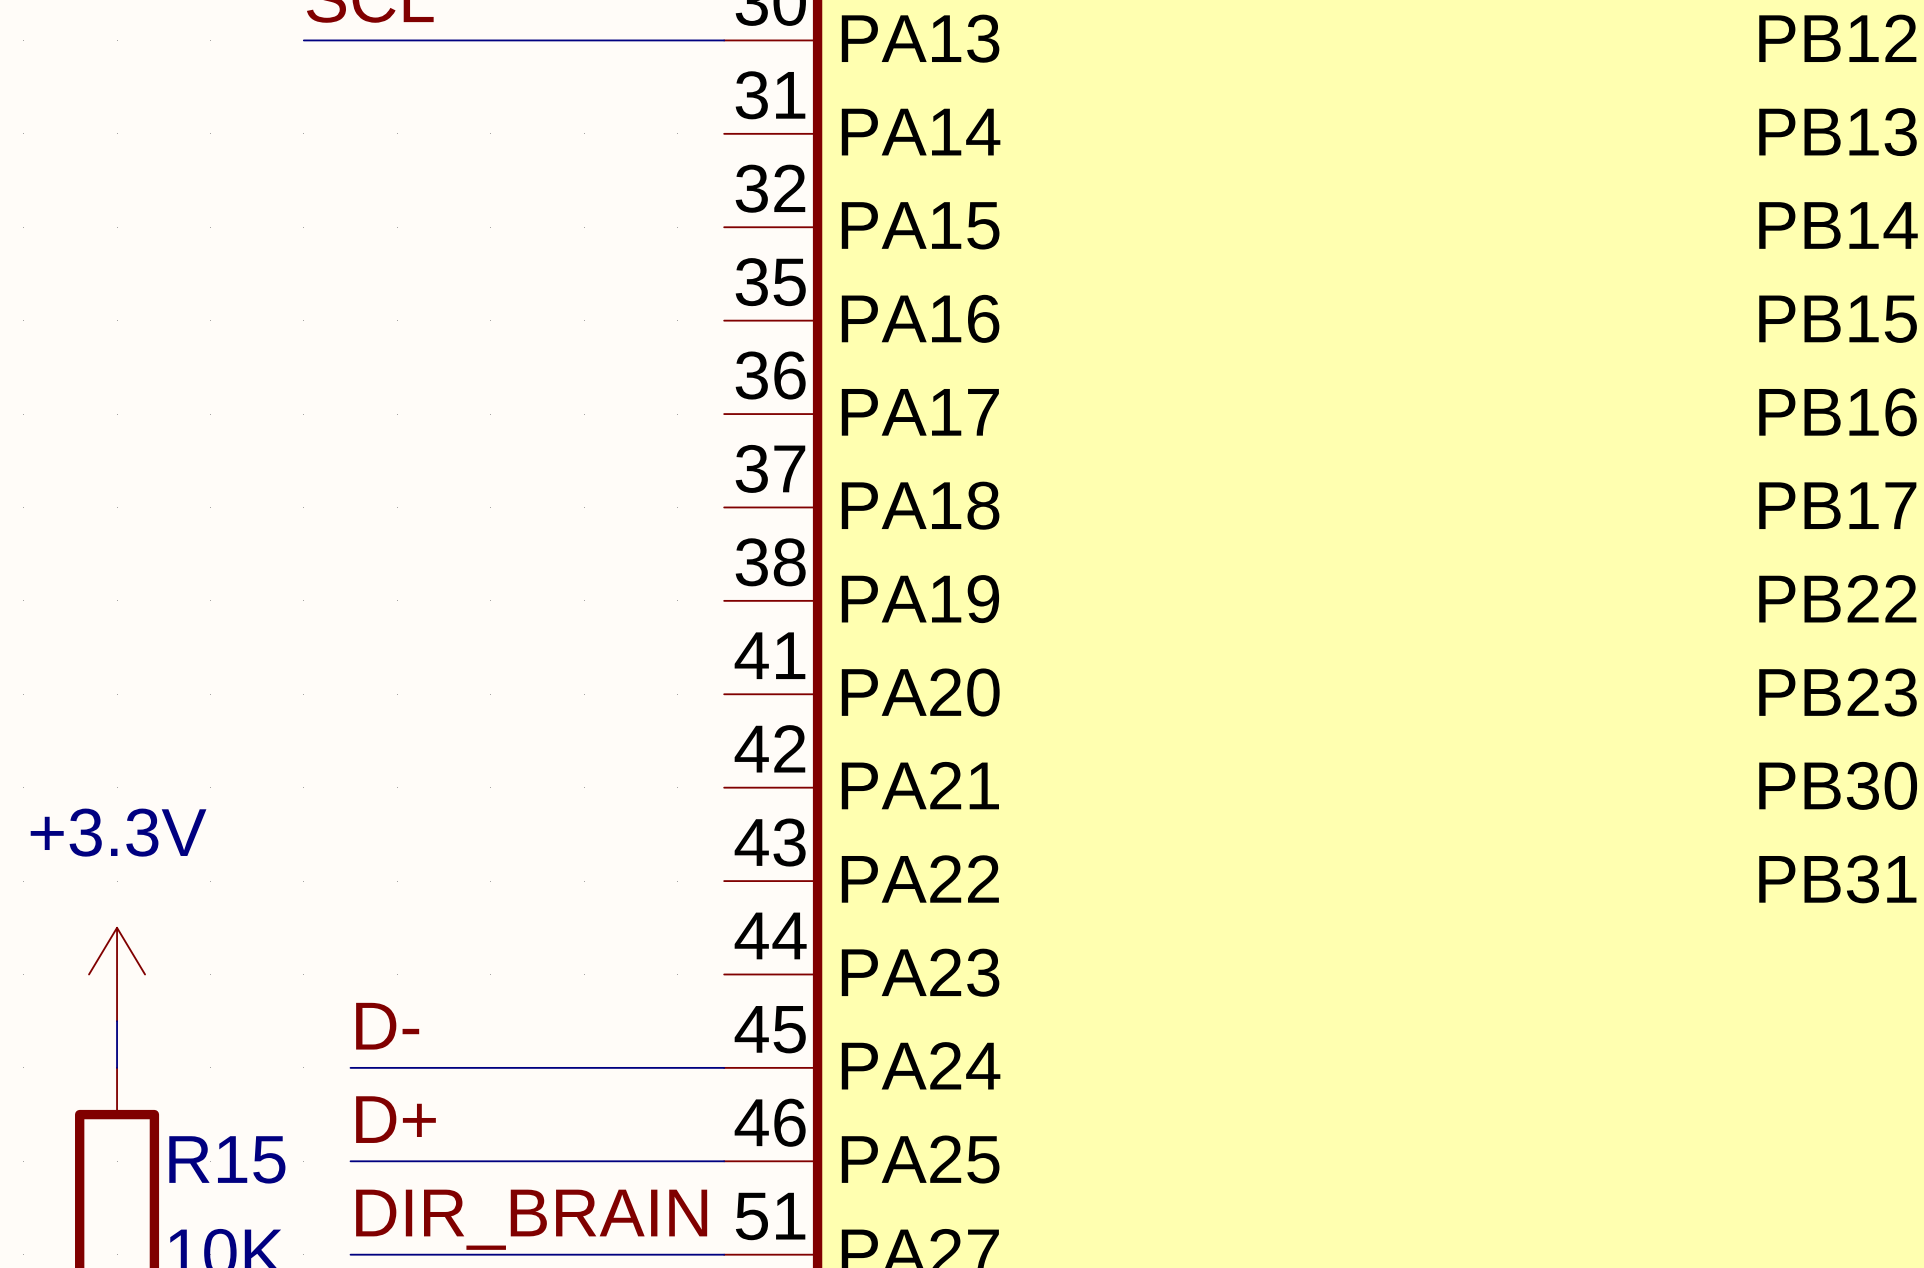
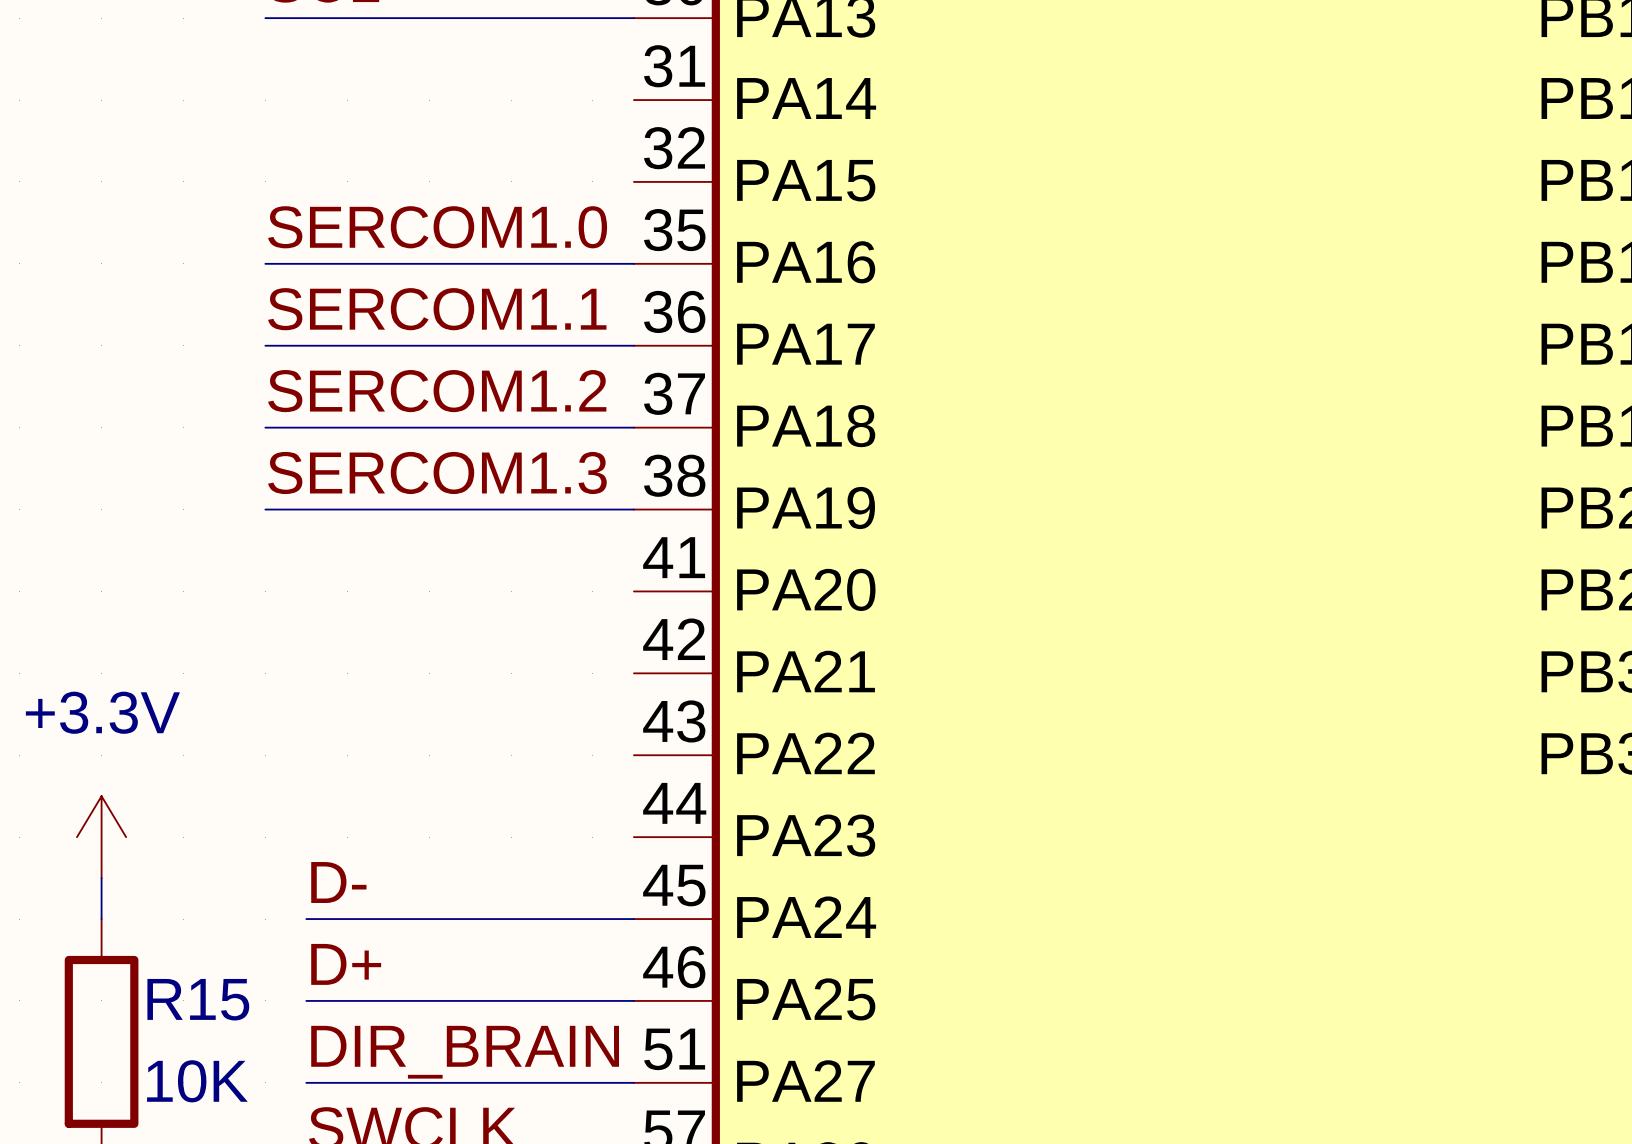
label: none -> SERCOM1.0 (437, 227)
wire: none -> (265, 263) (633, 263)
label: none -> SERCOM1.1 (437, 309)
wire: none -> (265, 345) (633, 345)
label: none -> SERCOM1.2 (437, 391)
wire: none -> (265, 427) (633, 427)
label: none -> SERCOM1.3 (437, 472)
wire: none -> (265, 509) (633, 509)

